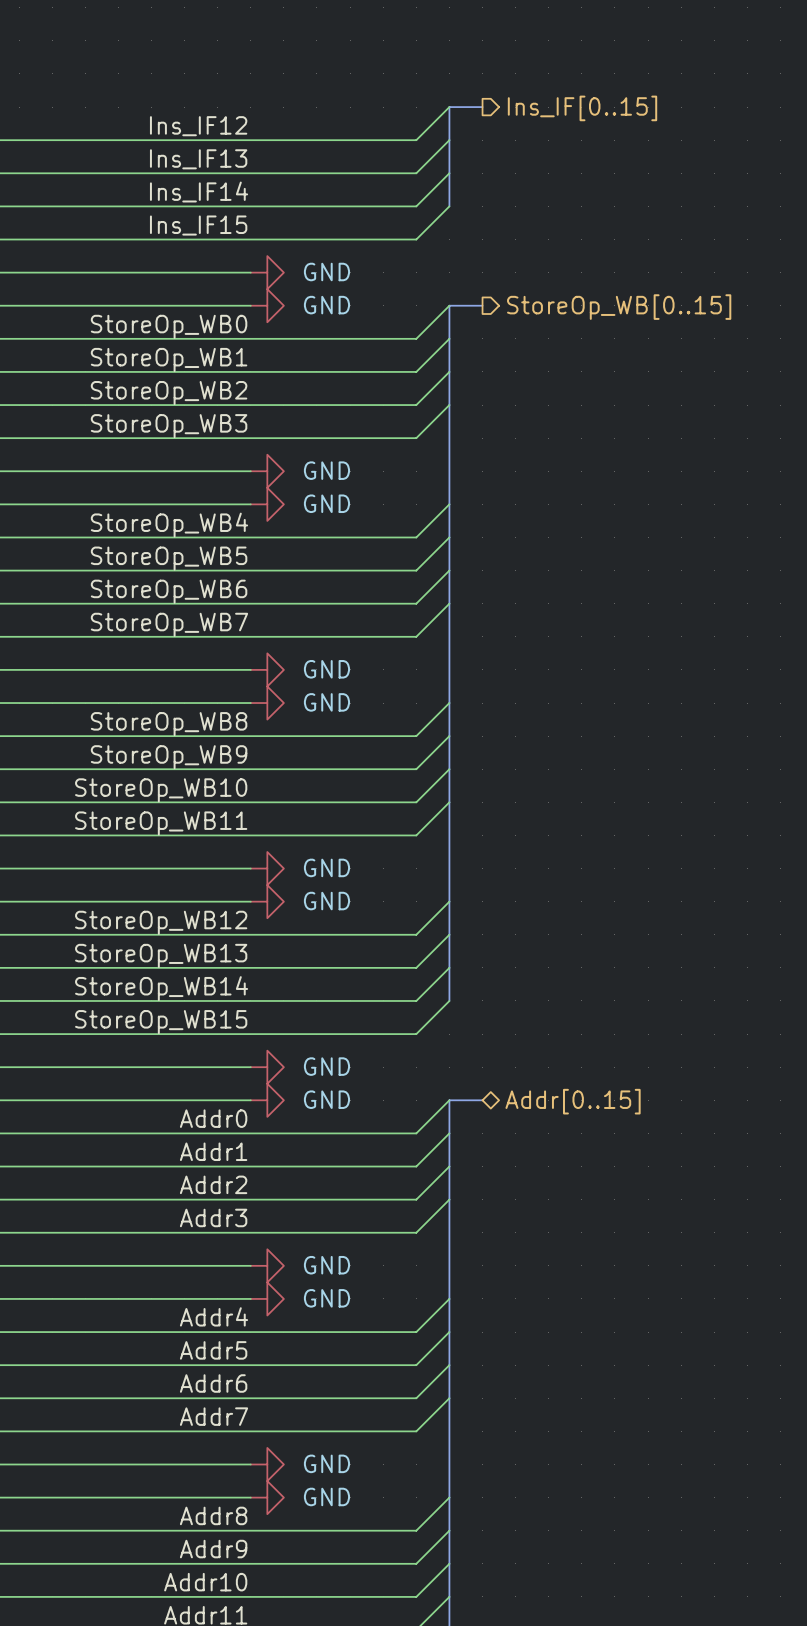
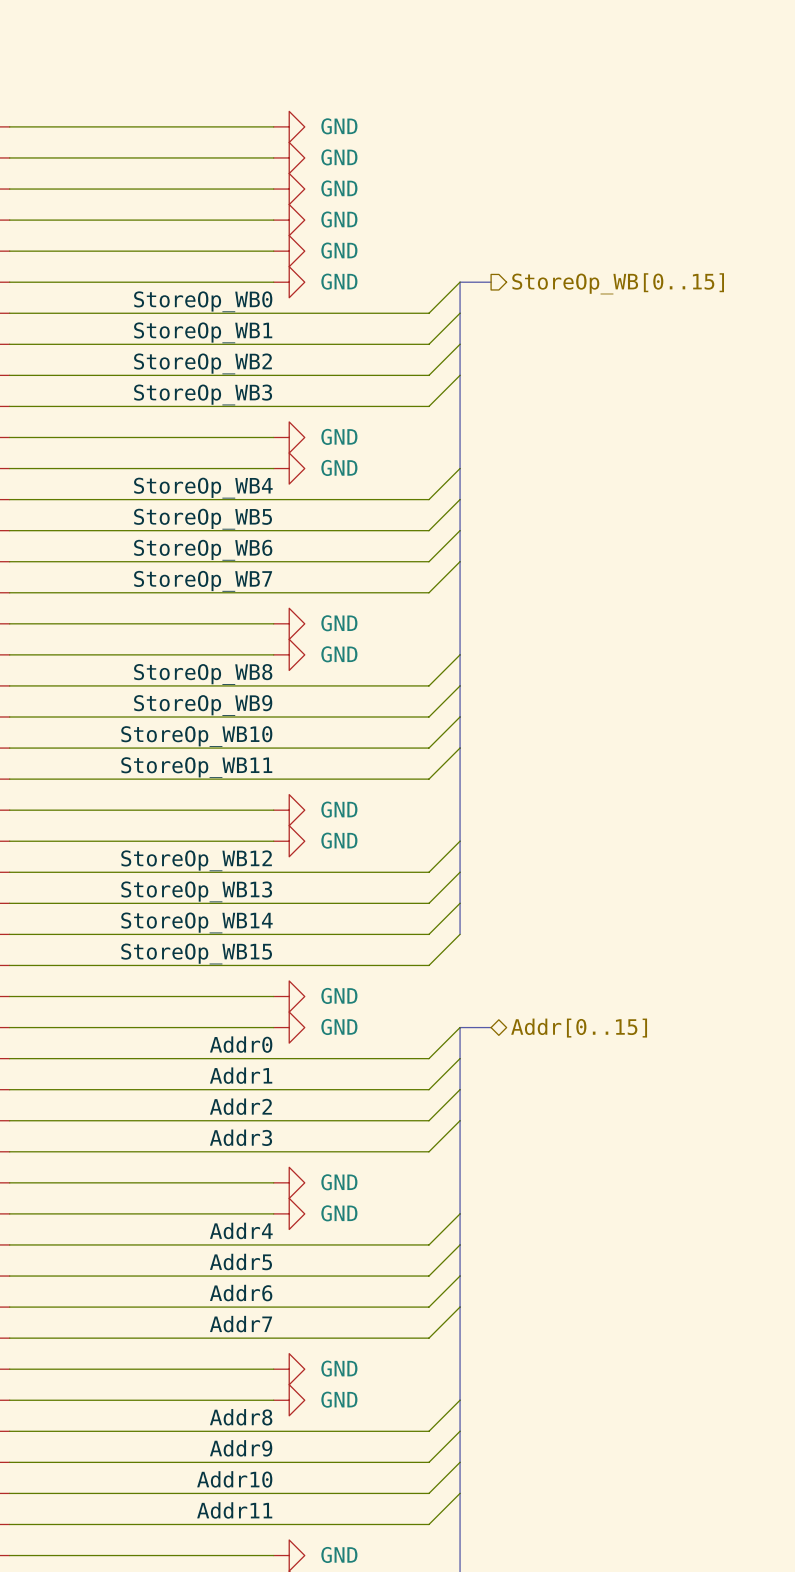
wire: (449, 107) (416, 140) (250, 140) -> none
bus: (482, 107) (449, 107) (449, 206) -> none
hierarchical label: Ins_IF[0..15] (582, 108) -> none
label: Ins_IF12 (198, 126) -> none
power symbol: none -> GND (289, 126)
wire: (449, 140) (416, 173) (250, 173) -> none
label: Ins_IF13 (198, 159) -> none
power symbol: none -> GND (289, 157)
wire: (449, 173) (416, 206) (250, 206) -> none
label: Ins_IF14 (199, 192) -> none
power symbol: none -> GND (289, 189)
wire: (449, 206) (416, 239) (250, 239) -> none
label: Ins_IF15 (198, 225) -> none
power symbol: none -> GND (289, 220)

